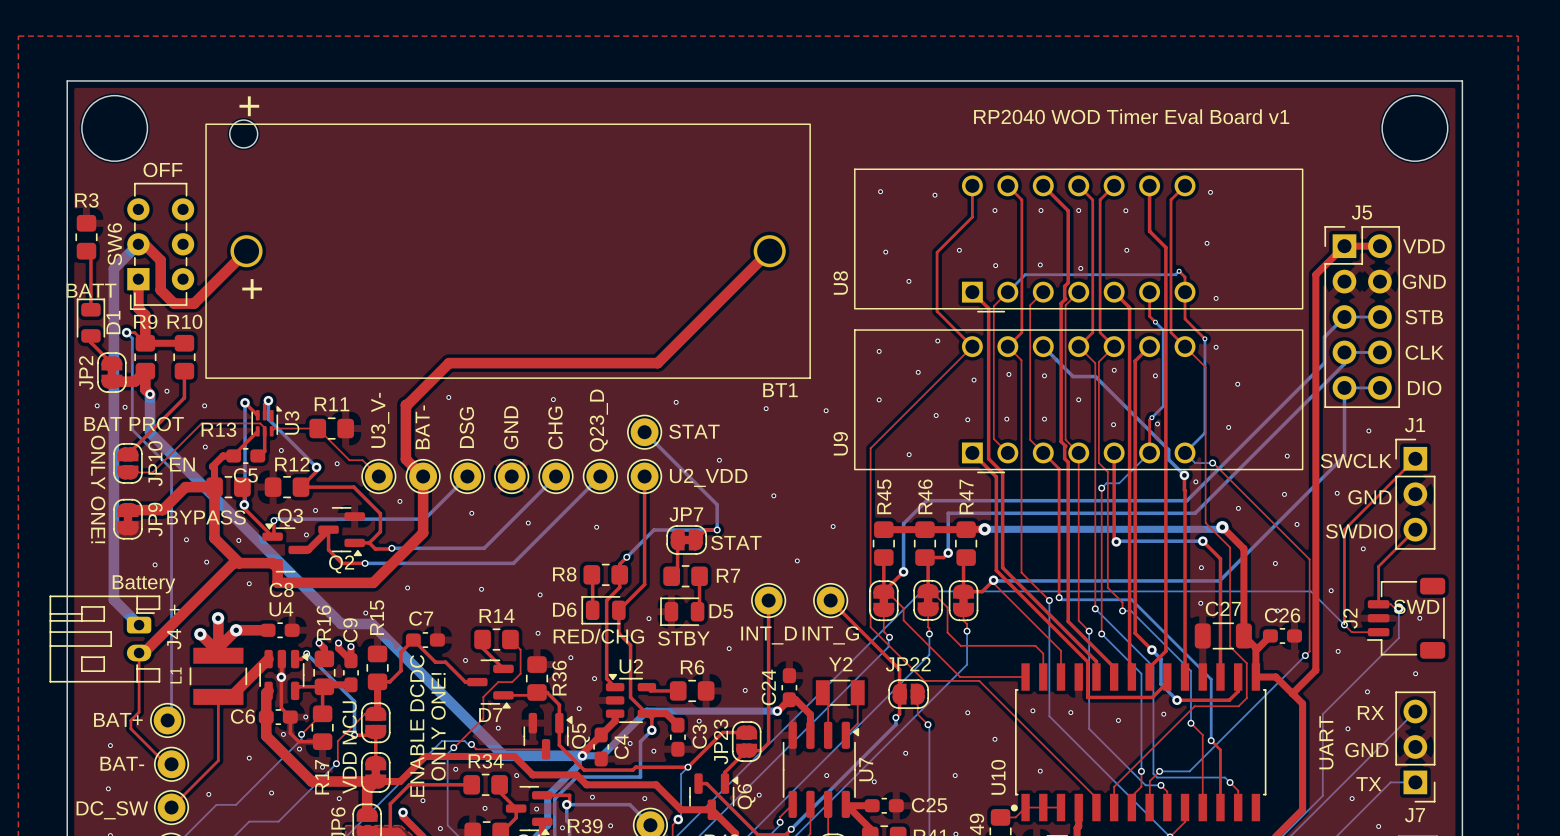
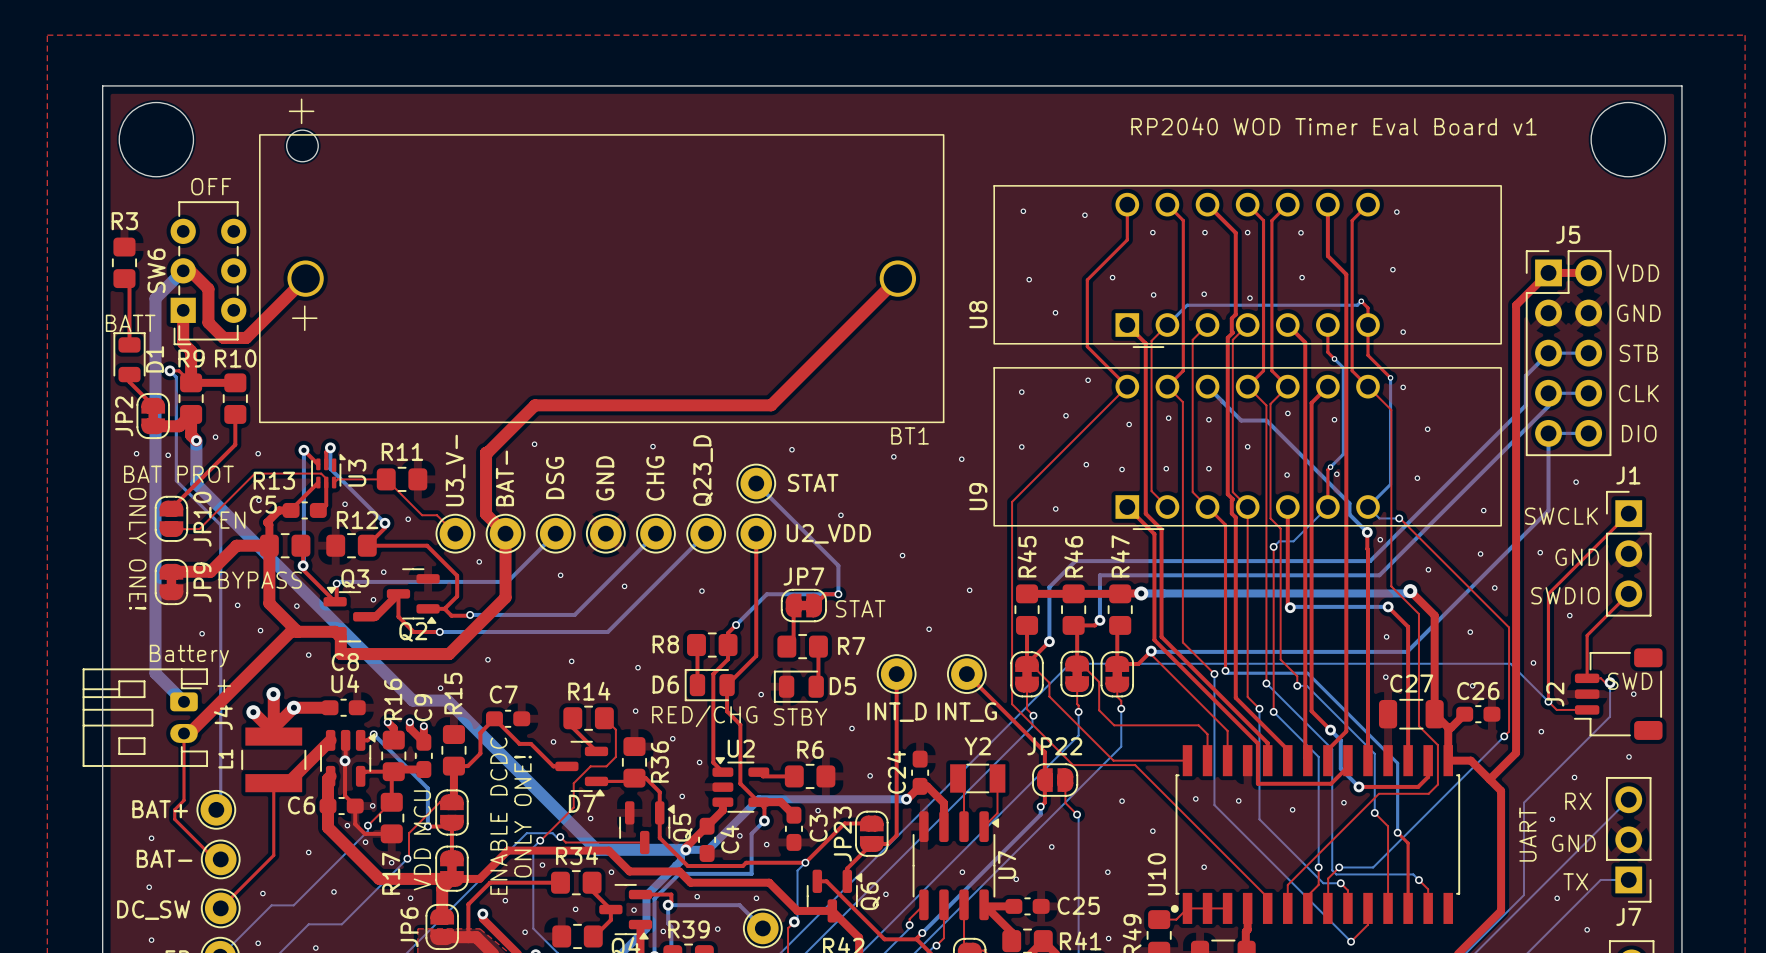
C5 name position: C5 (245, 475) -> C5 (263, 504)

